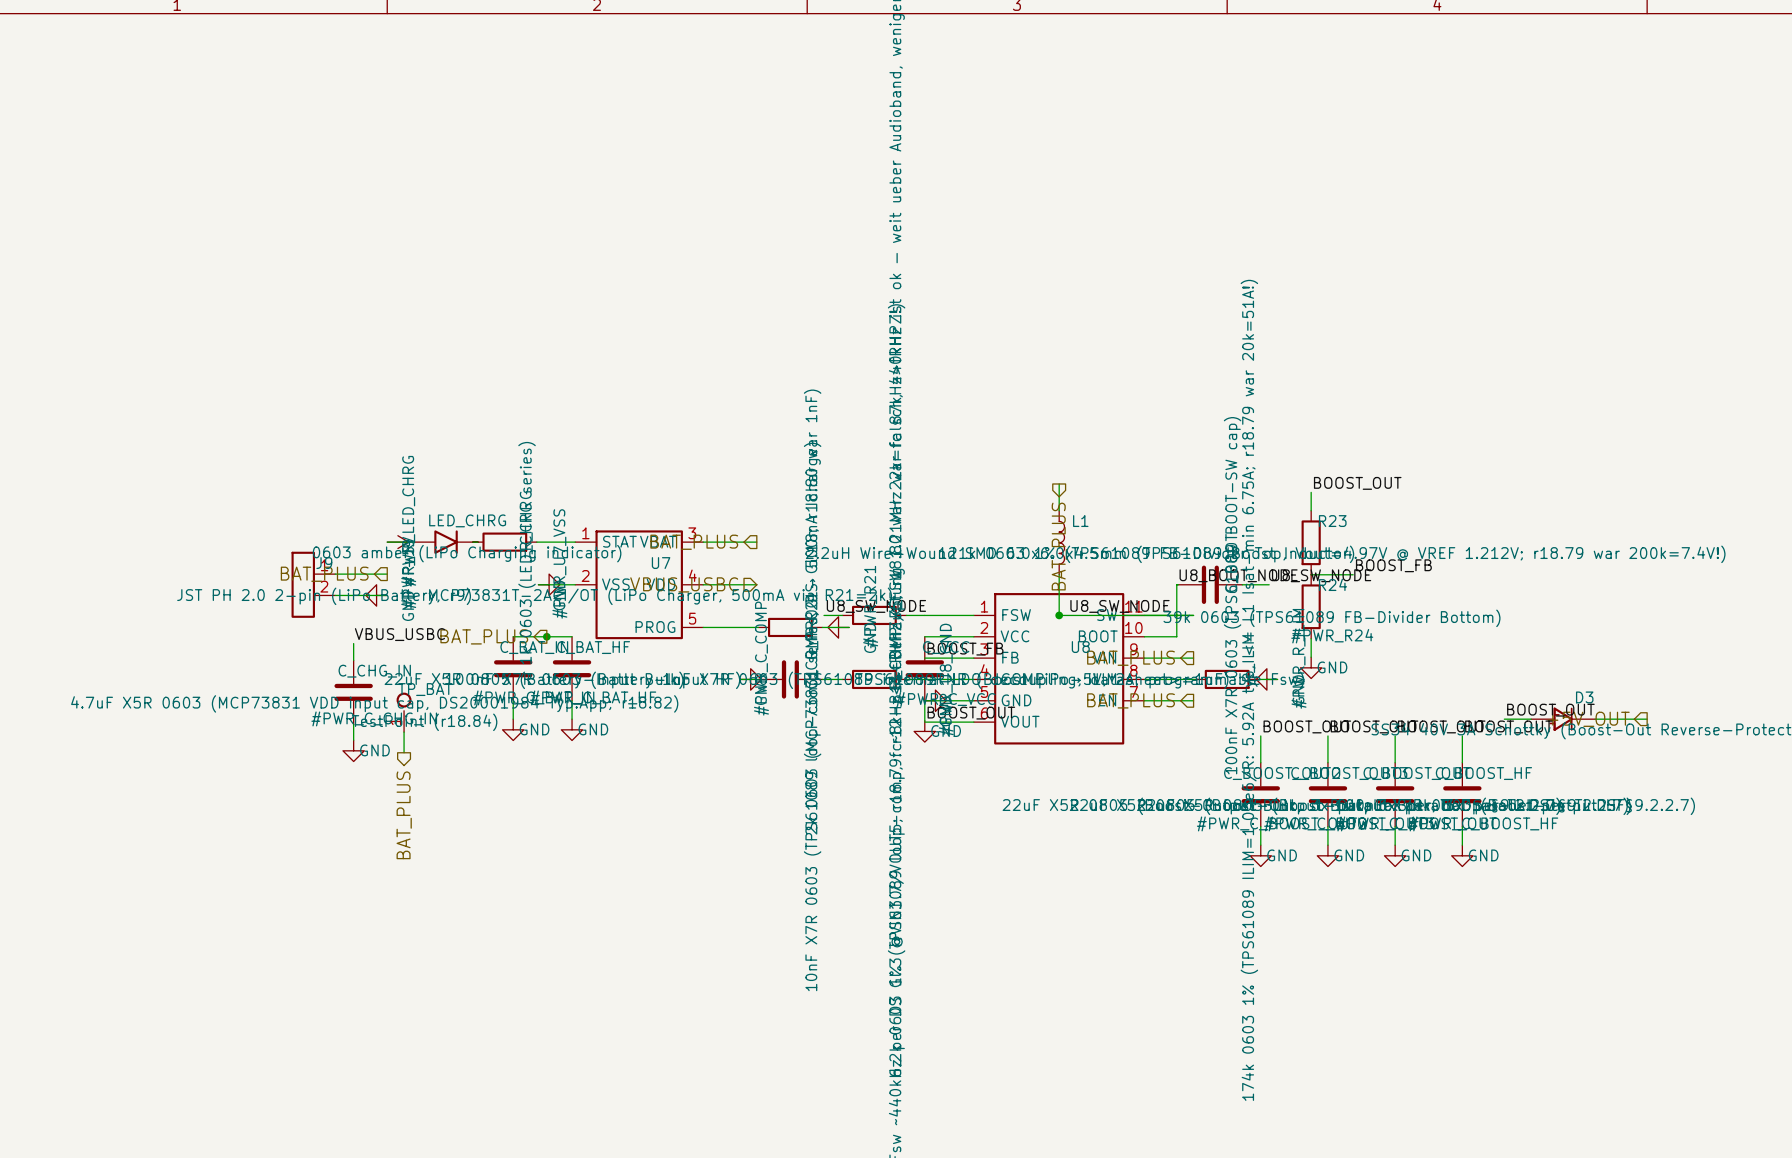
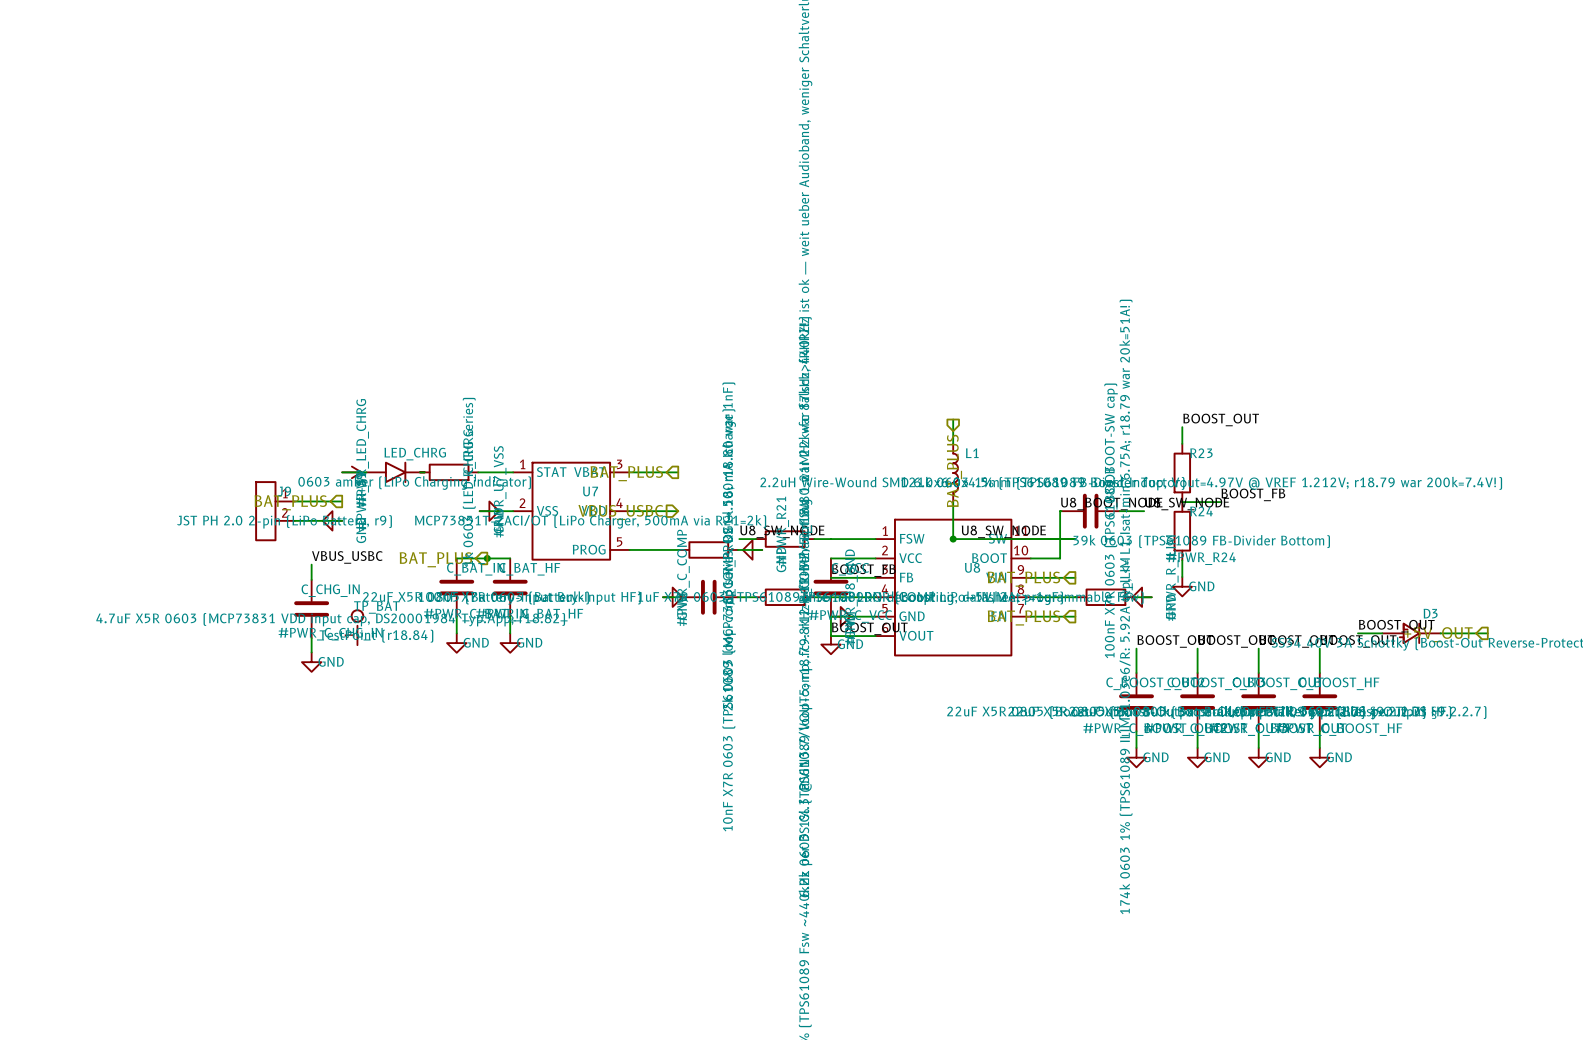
wire: (404, 732) (404, 752) -> none
hierarchical label: BAT_PLUS (404, 815) -> none

